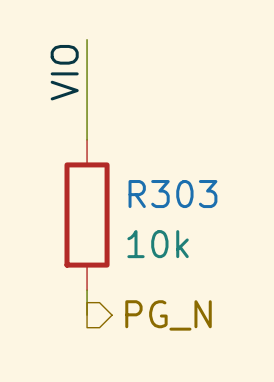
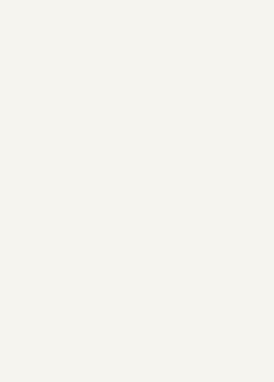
wire: (87, 39) (87, 139) -> none
label: VIO (64, 72) -> none
R303: 10k (87, 215) -> none
wire: (87, 290) (87, 315) -> none
hierarchical label: PG_N (168, 315) -> none

